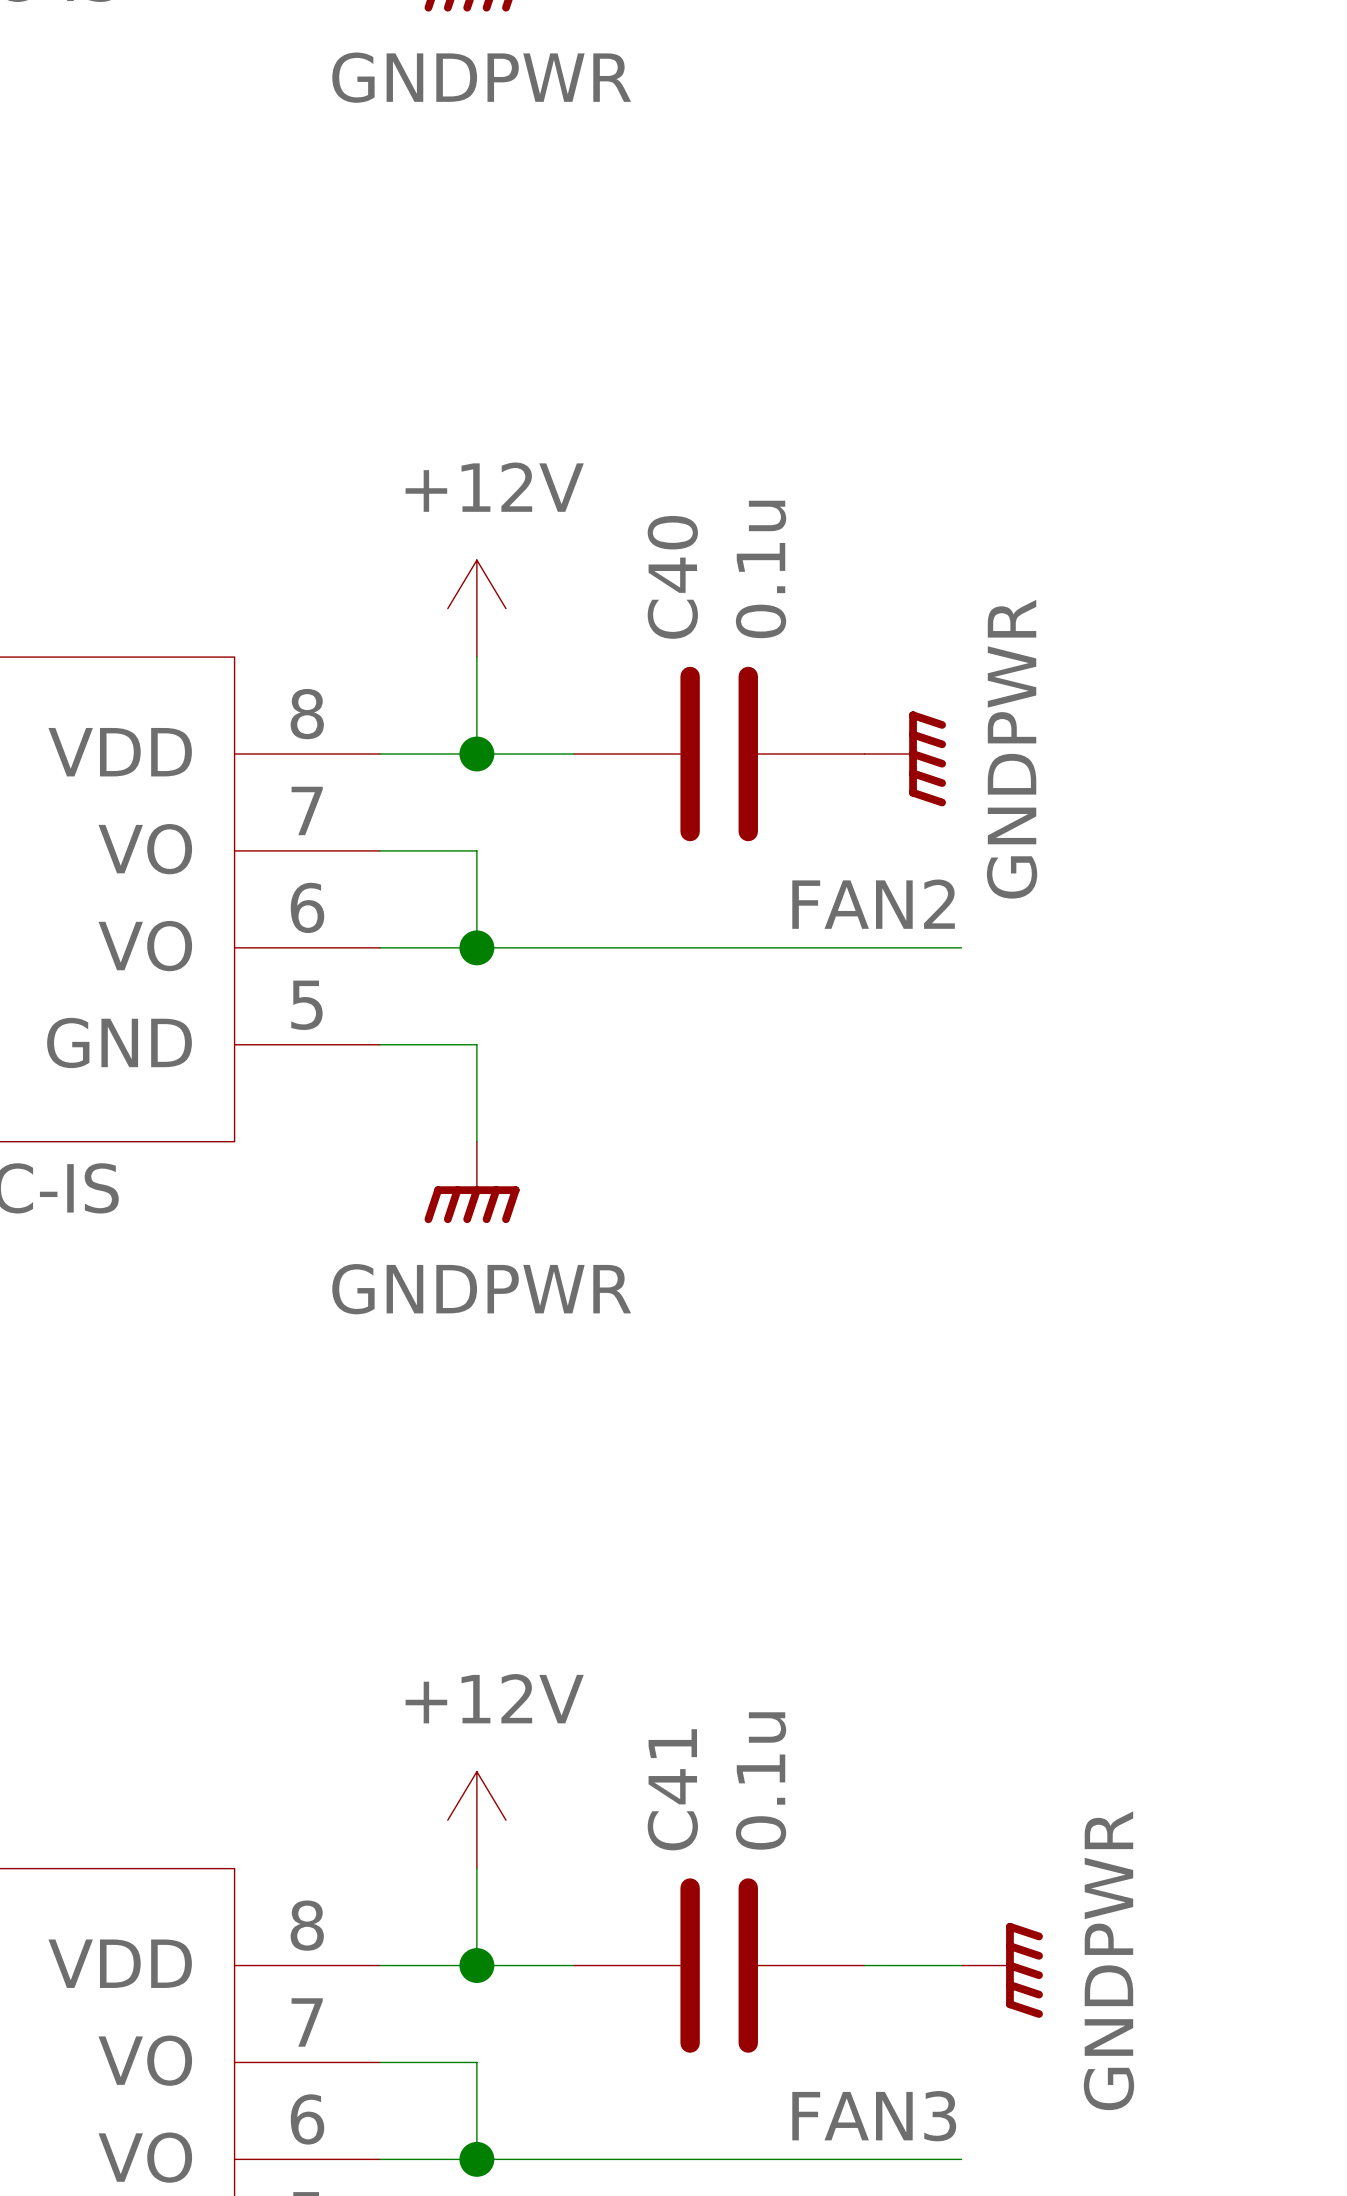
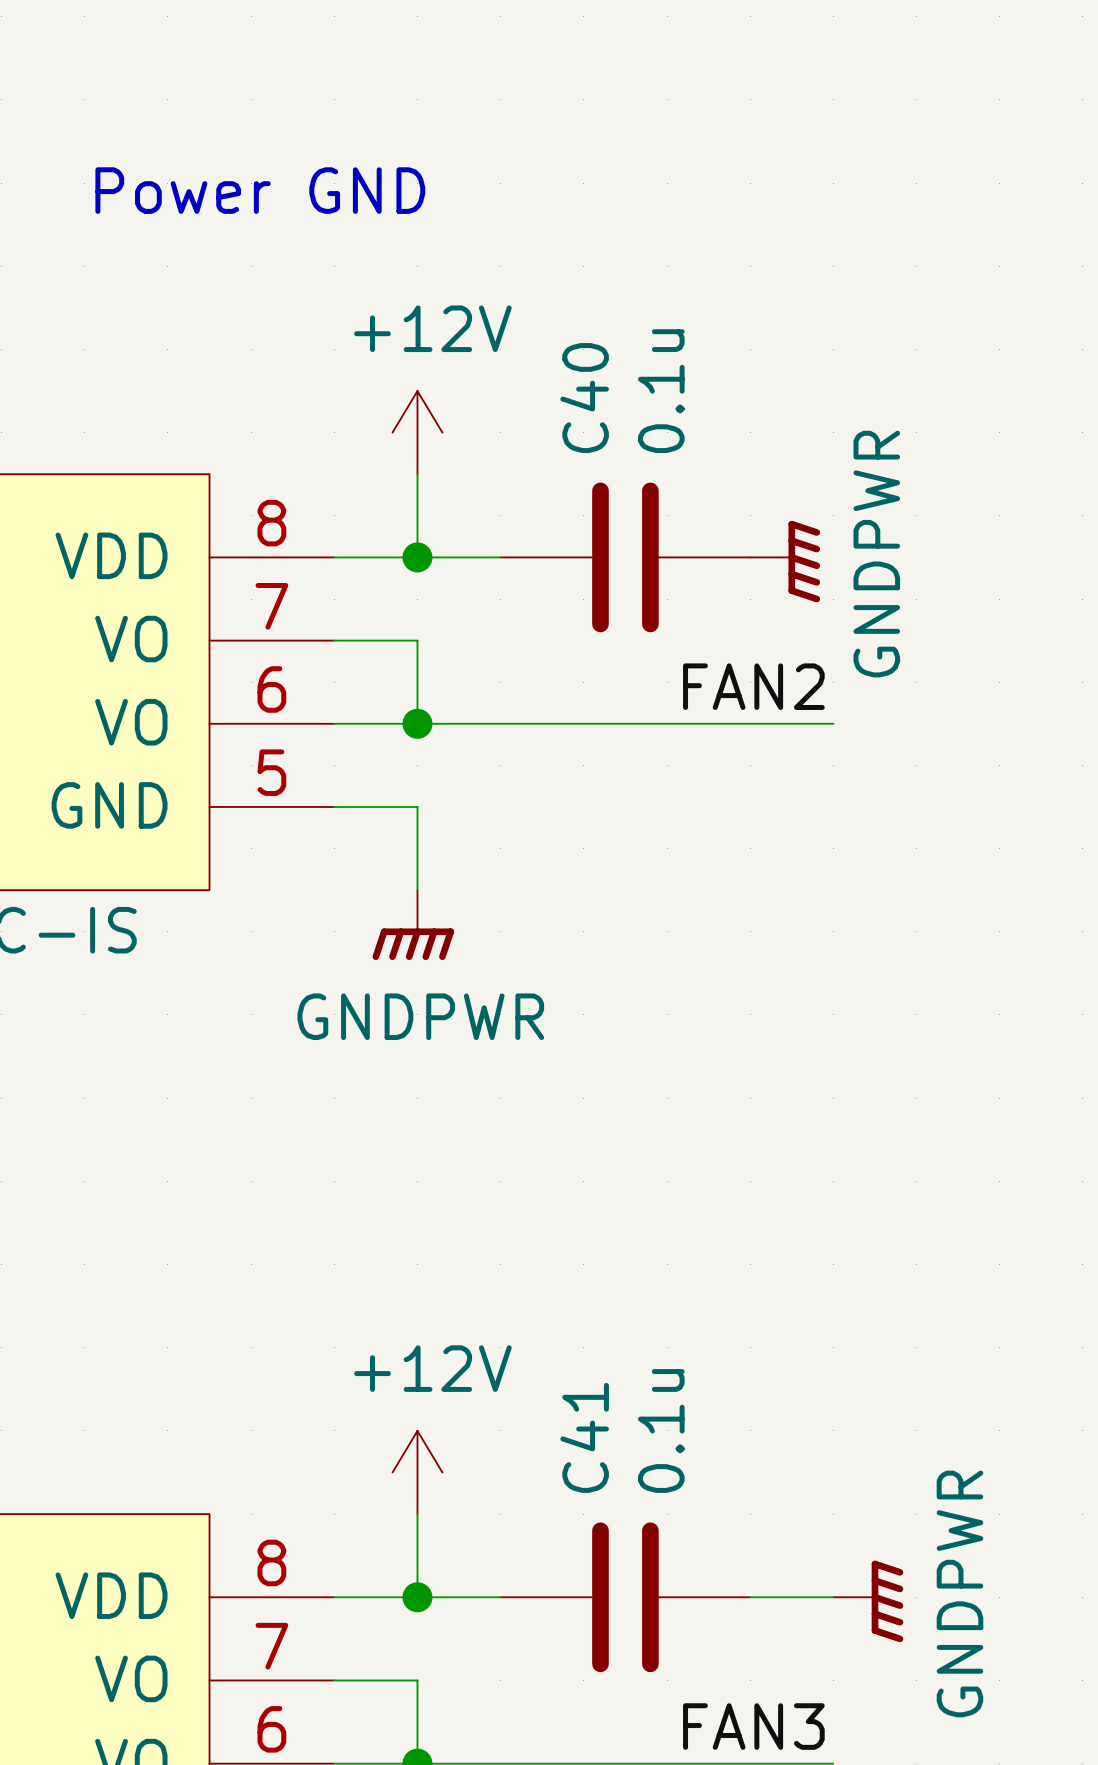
text: none -> Power GND (260, 190)

